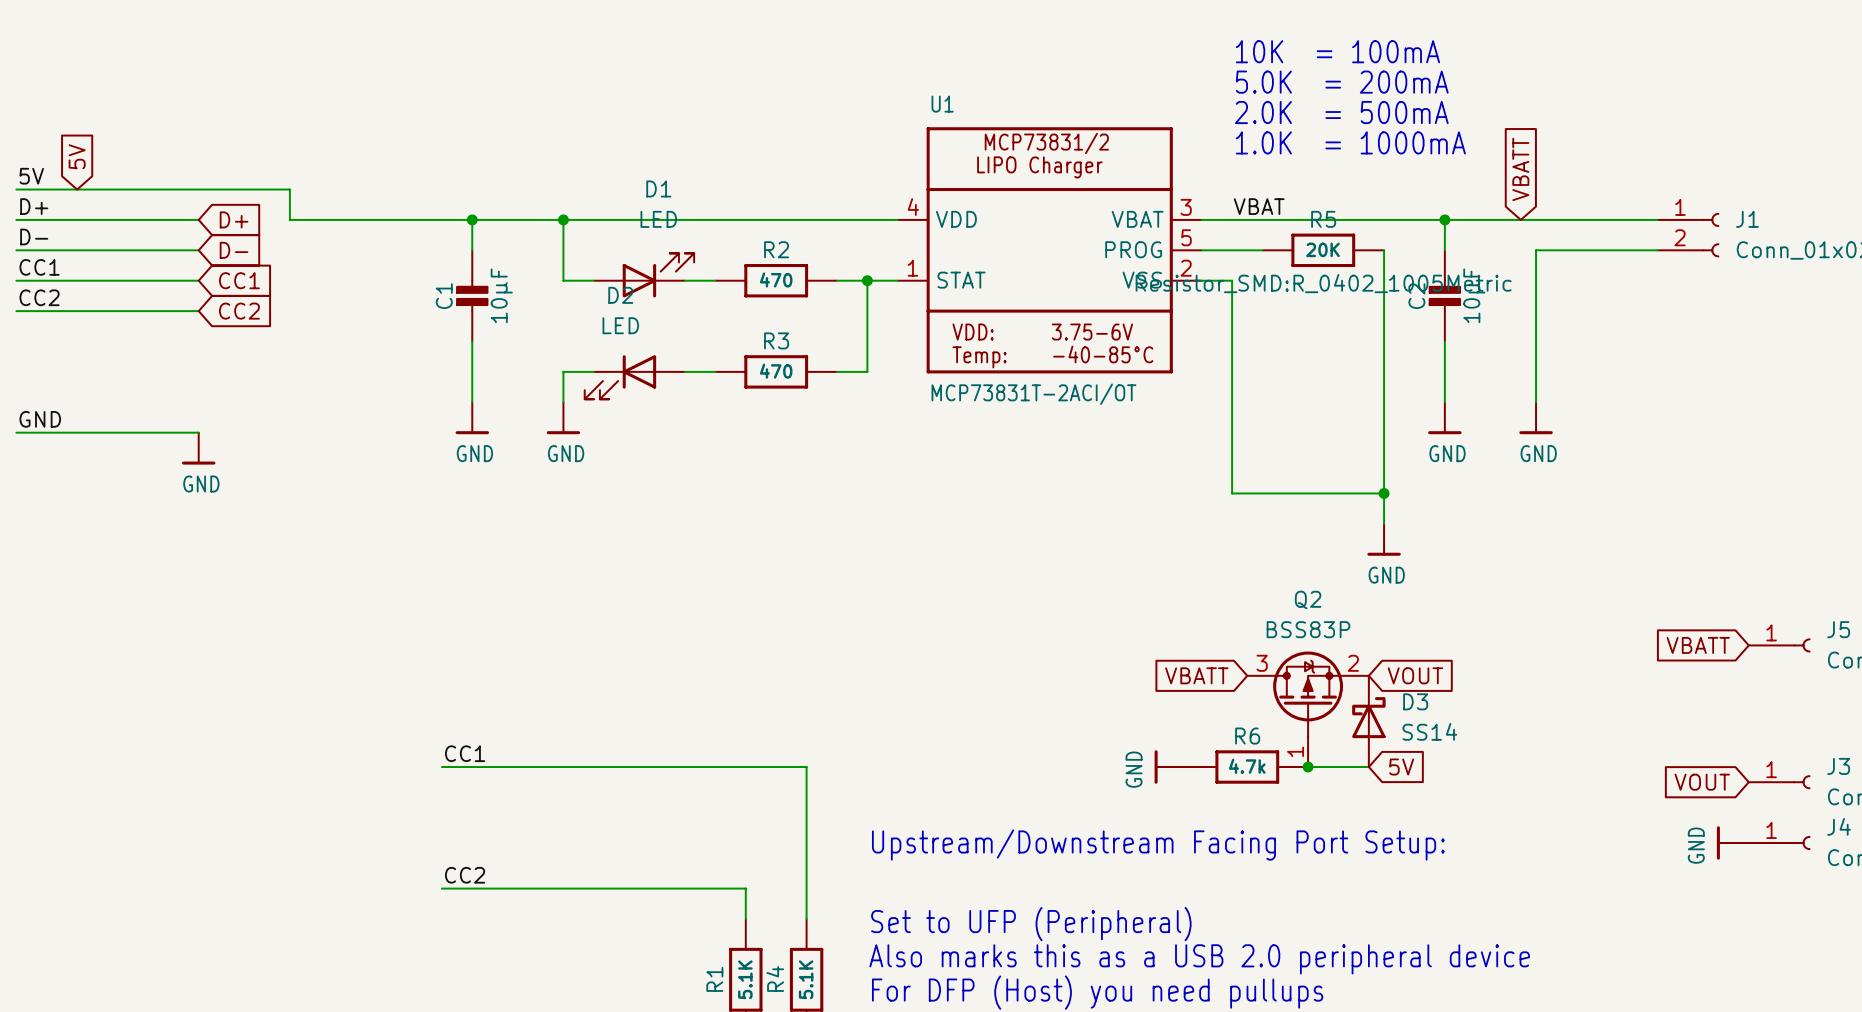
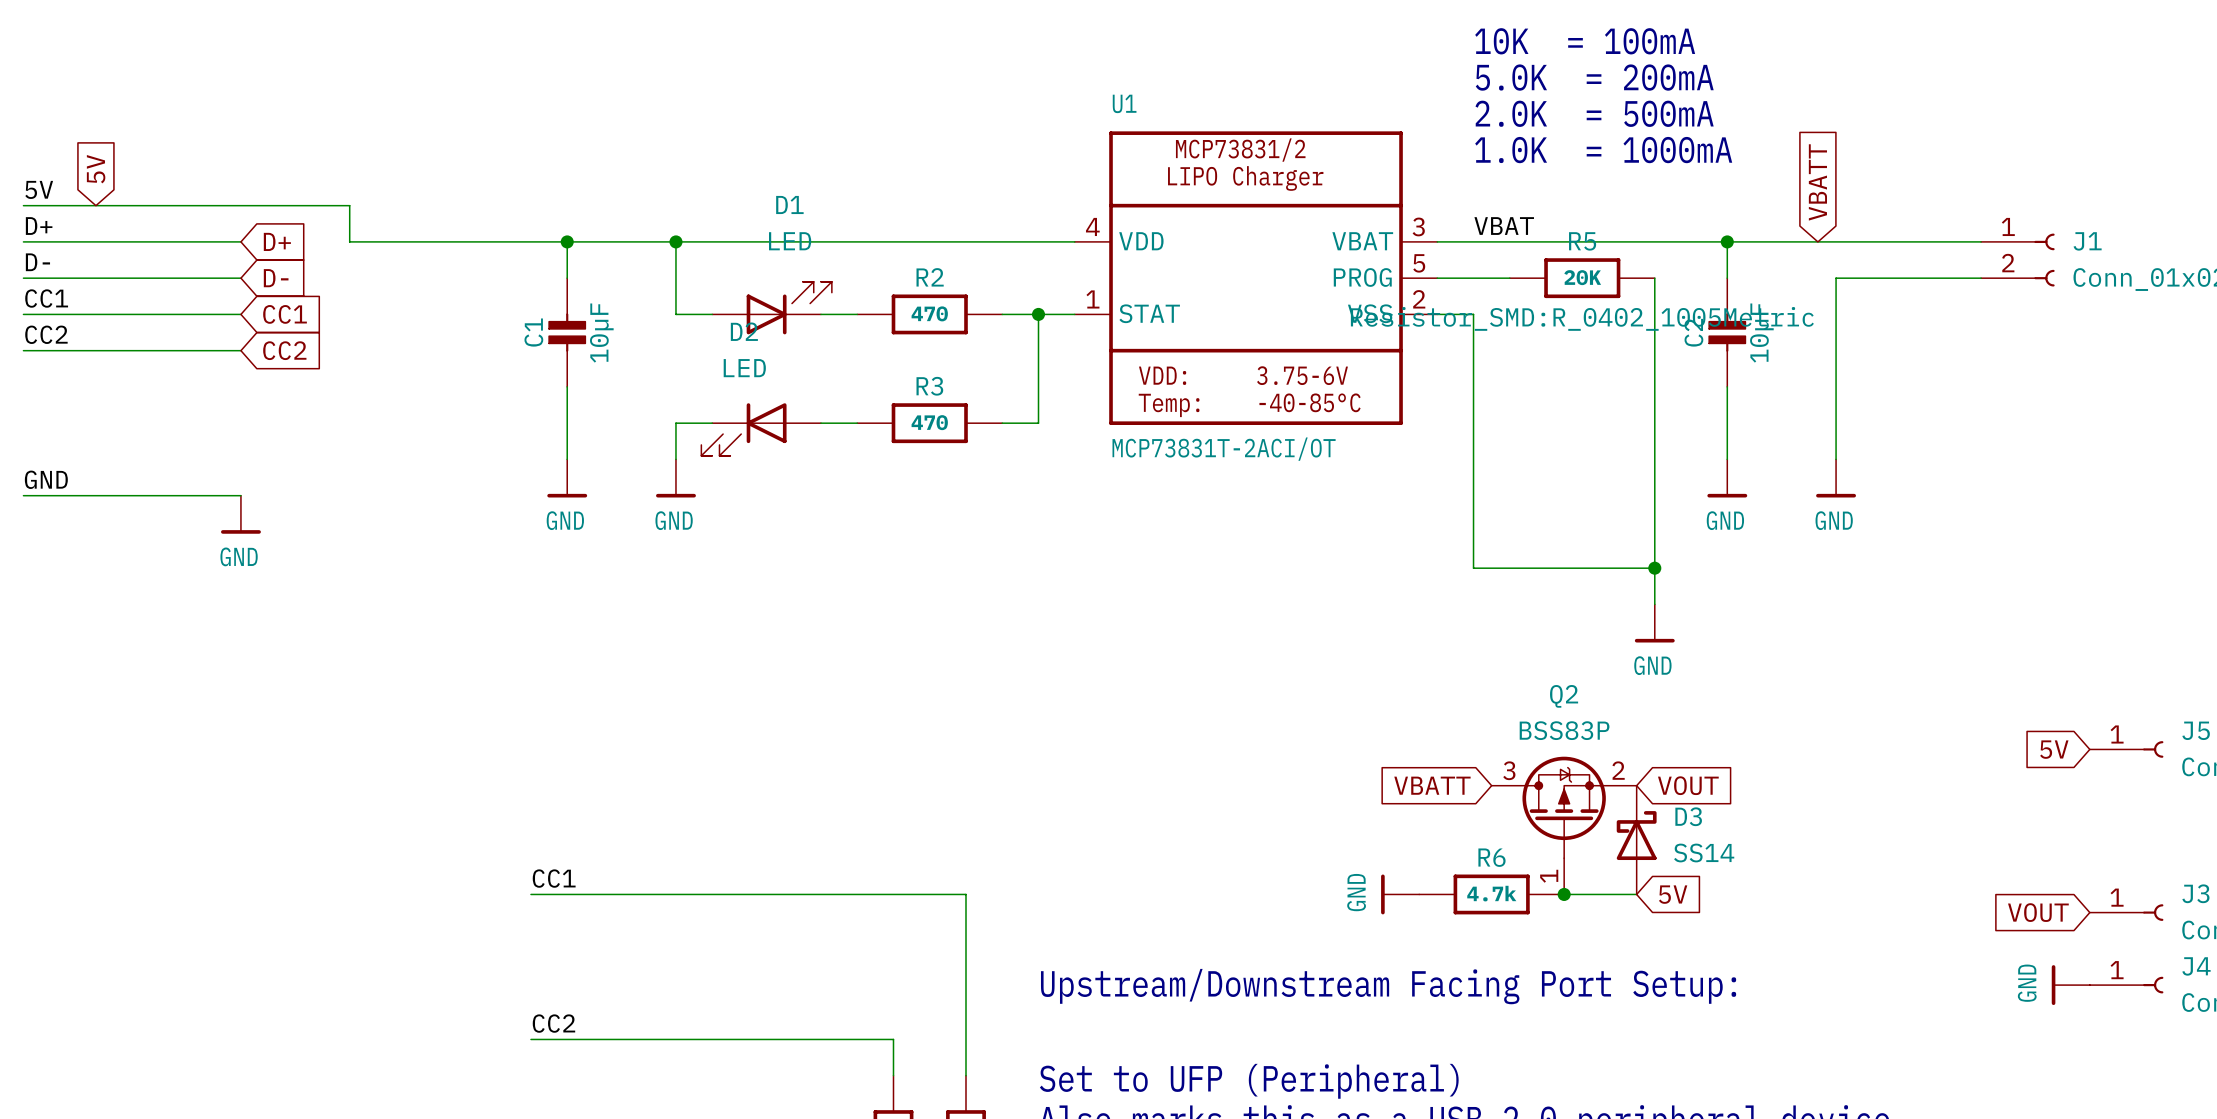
global label: VBATT (1698, 645) -> 5V (2054, 749)

